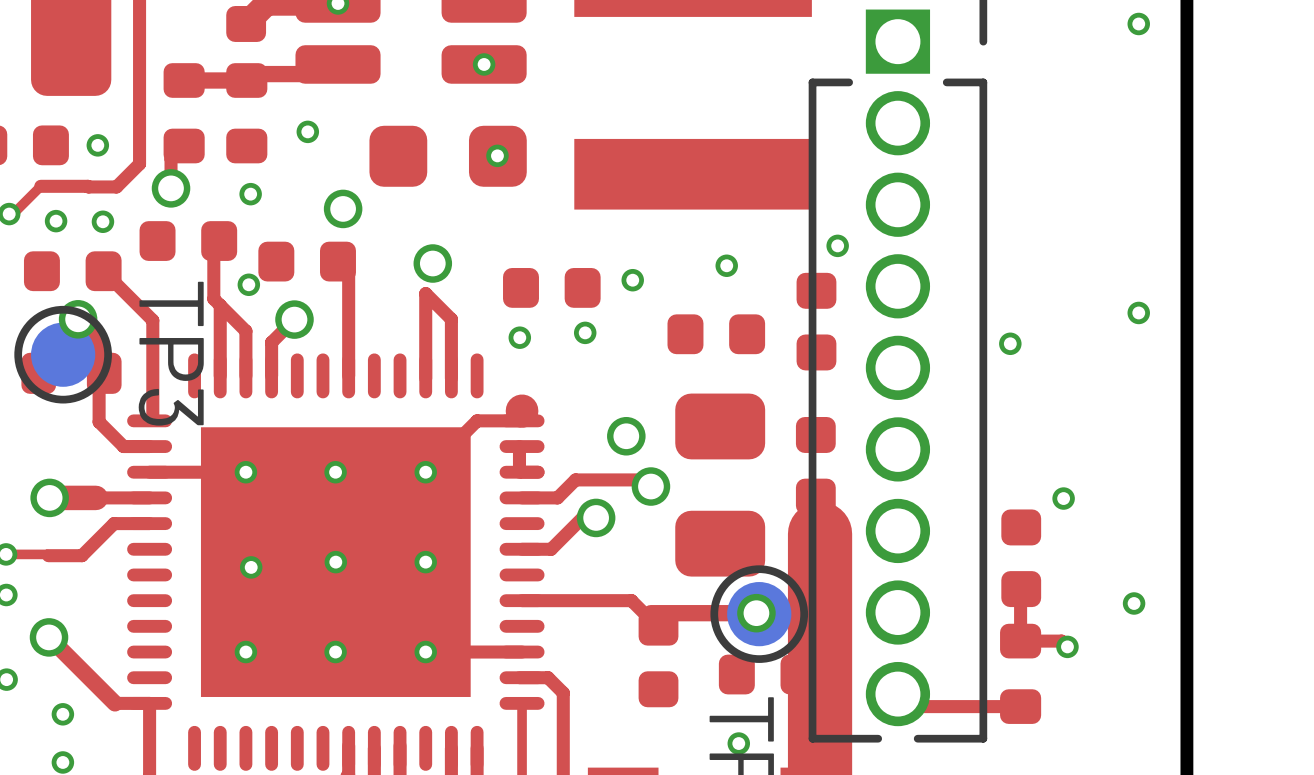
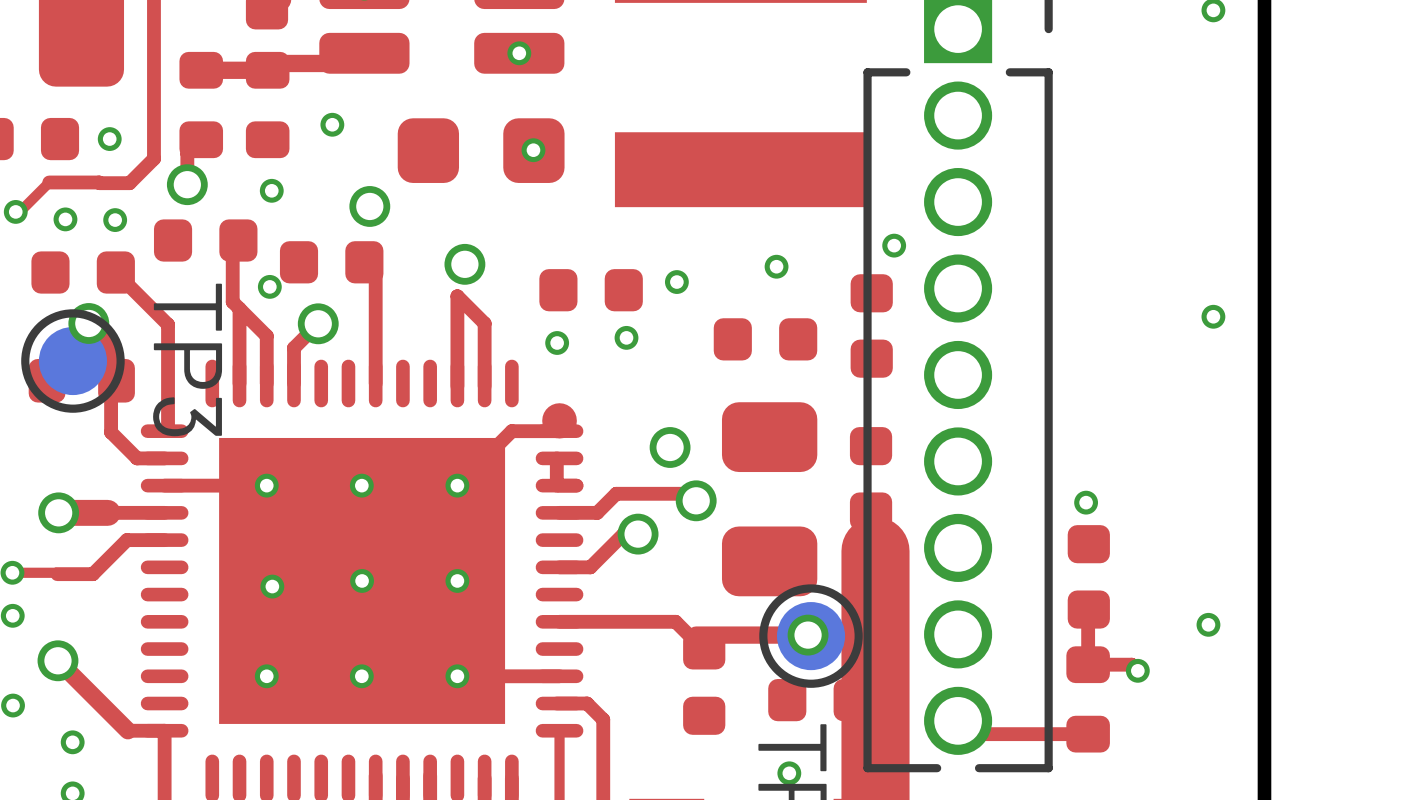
via: (1010, 343) -> none
via position: (1063, 498) -> (1086, 502)

